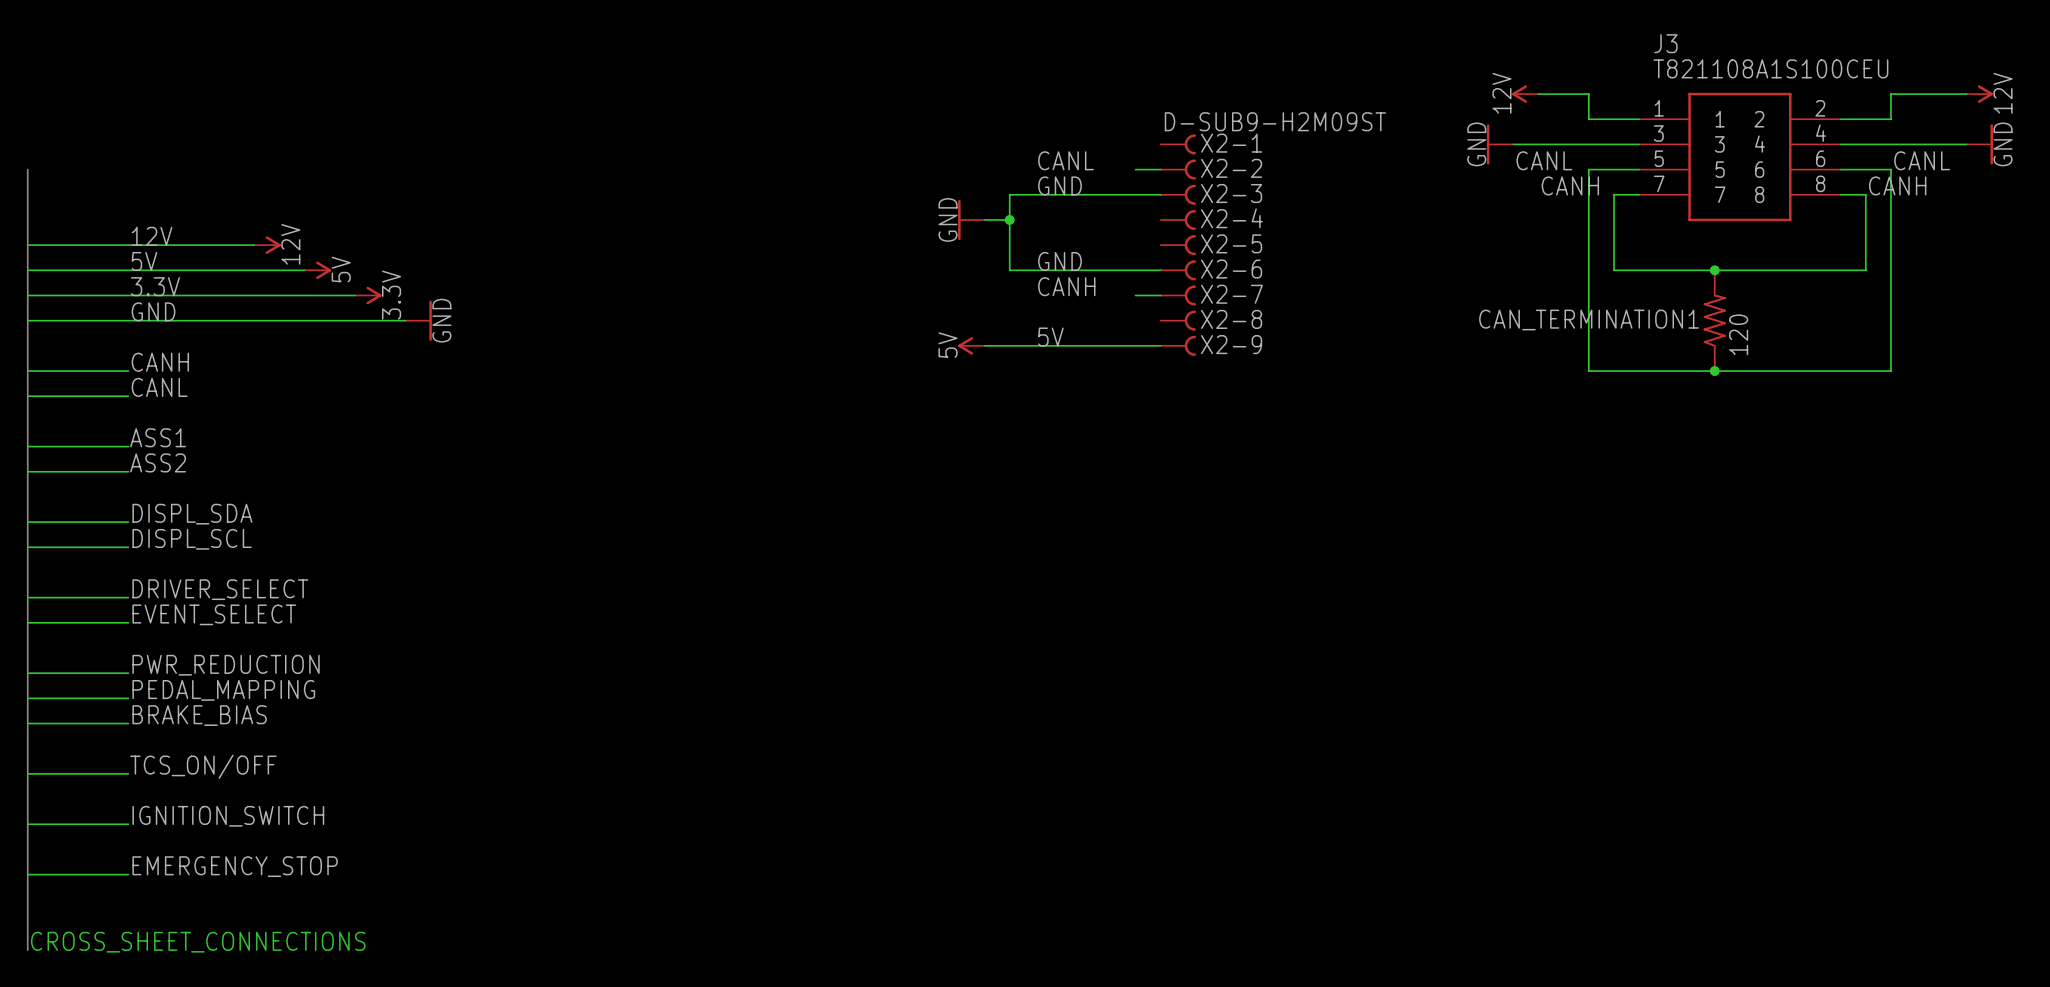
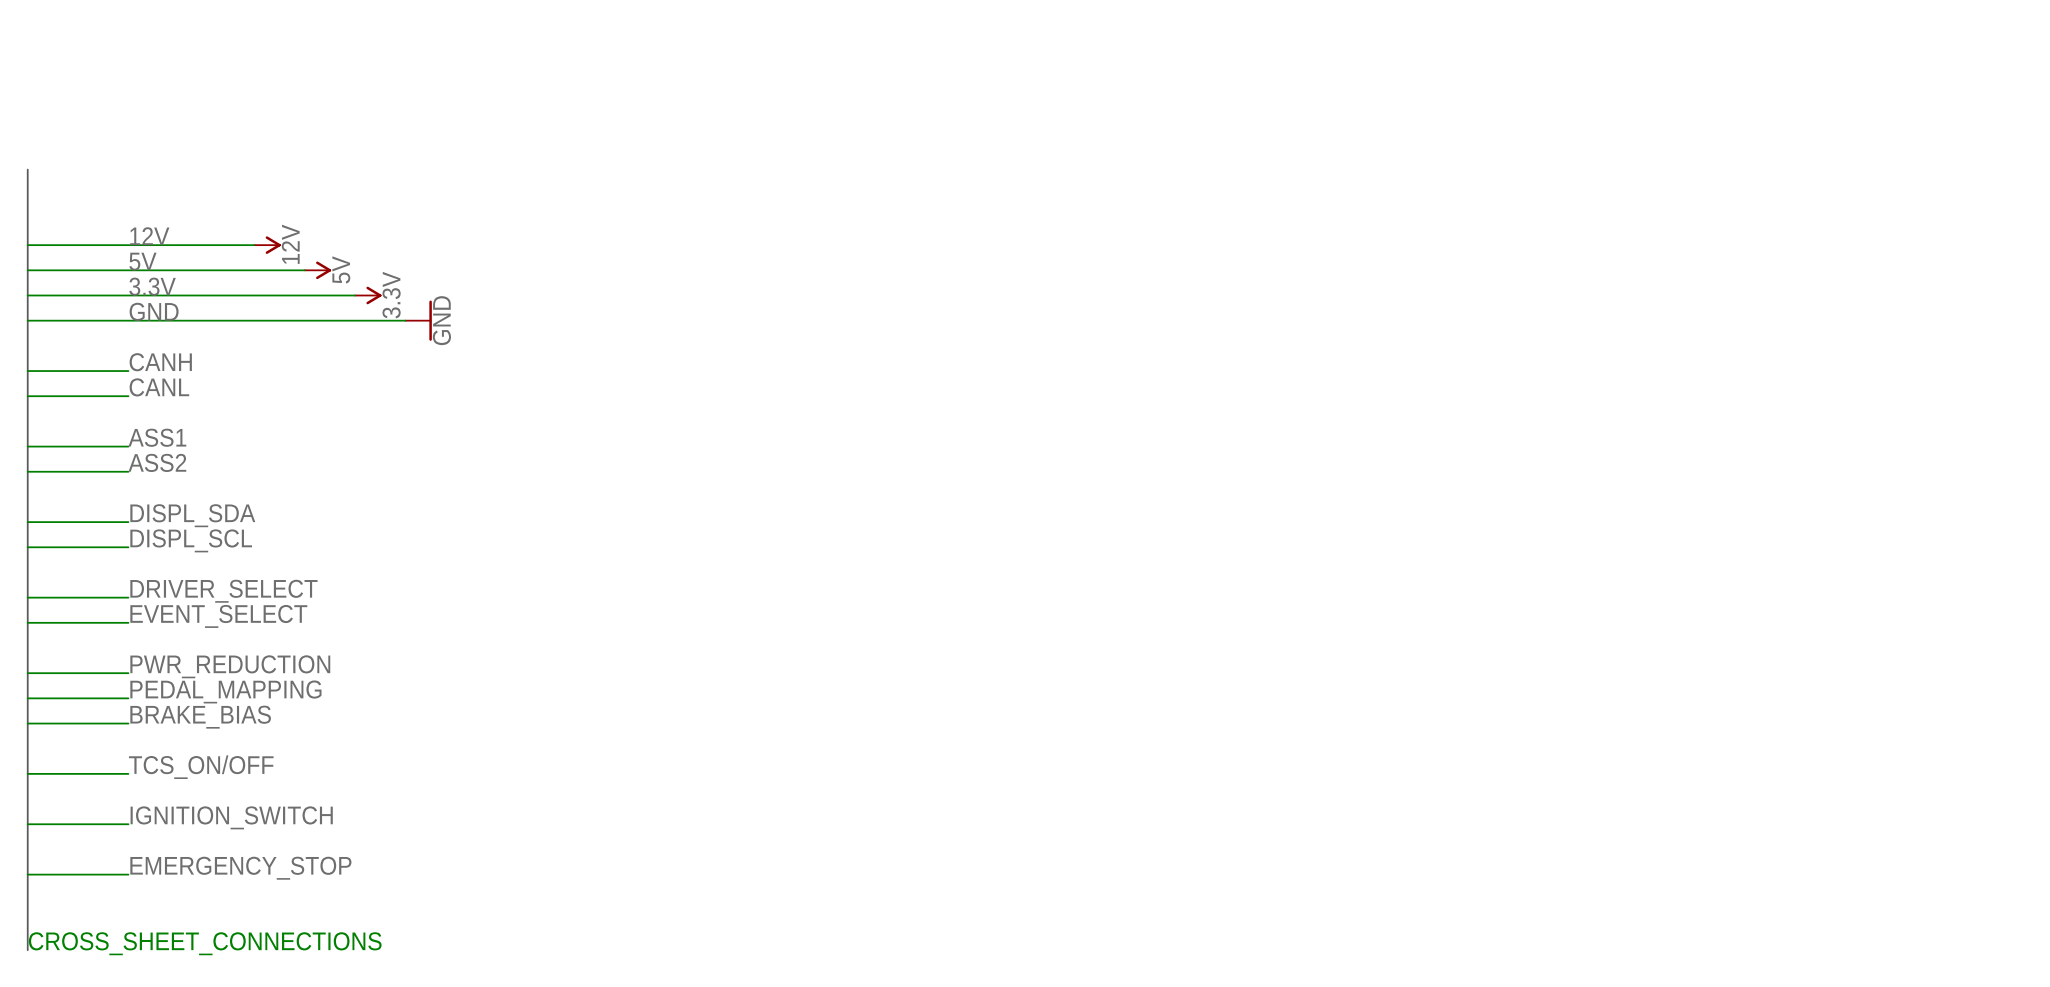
power symbol: 12V (1525, 94) -> none
wire: (1538, 94) (1588, 94) (1588, 119) (1639, 119) -> none
wire: (1966, 94) (1890, 94) (1890, 119) (1840, 119) -> none
power symbol: 12V (1979, 94) -> none
X2-1: D-SUB9-H2M09ST (1178, 144) -> none
power symbol: GND (1500, 144) -> none
wire: (1513, 144) (1639, 144) -> none
wire: (1840, 144) (1966, 144) -> none
power symbol: GND (1979, 144) -> none
J3: T821108A1S100CEU (1739, 157) -> none
label: CANL (1066, 160) -> none
label: CANL (1544, 160) -> none
label: CANL (1922, 160) -> none
wire: (1135, 169) (1160, 169) -> none
X2-2: (1178, 169) -> none
wire: (1639, 169) (1588, 169) (1588, 371) (1890, 371) (1890, 169) (1840, 169) -> none
label: GND (1059, 185) -> none
label: CANH (1570, 185) -> none
label: CANH (1897, 185) -> none
wire: (1160, 194) (1009, 194) (1009, 270) (1160, 270) -> none
X2-3: (1178, 194) -> none
wire: (1639, 194) (1614, 194) (1614, 270) (1865, 270) (1865, 194) (1840, 194) -> none
power symbol: GND (971, 219) -> none
wire: (984, 219) (1009, 219) -> none
junction: (1009, 219) -> none
X2-4: (1178, 219) -> none
X2-5: (1178, 245) -> none
label: GND (1059, 261) -> none
X2-6: (1178, 270) -> none
junction: (1714, 270) -> none
label: CANH (1066, 286) -> none
wire: (1135, 295) (1160, 295) -> none
X2-7: (1178, 295) -> none
X2-8: (1178, 320) -> none
CAN_TERMINATION1: 120 (1714, 320) -> none
label: 5V (1050, 337) -> none
power symbol: 5V (971, 345) -> none
wire: (984, 345) (1160, 345) -> none
X2-9: (1178, 345) -> none
junction: (1714, 371) -> none

